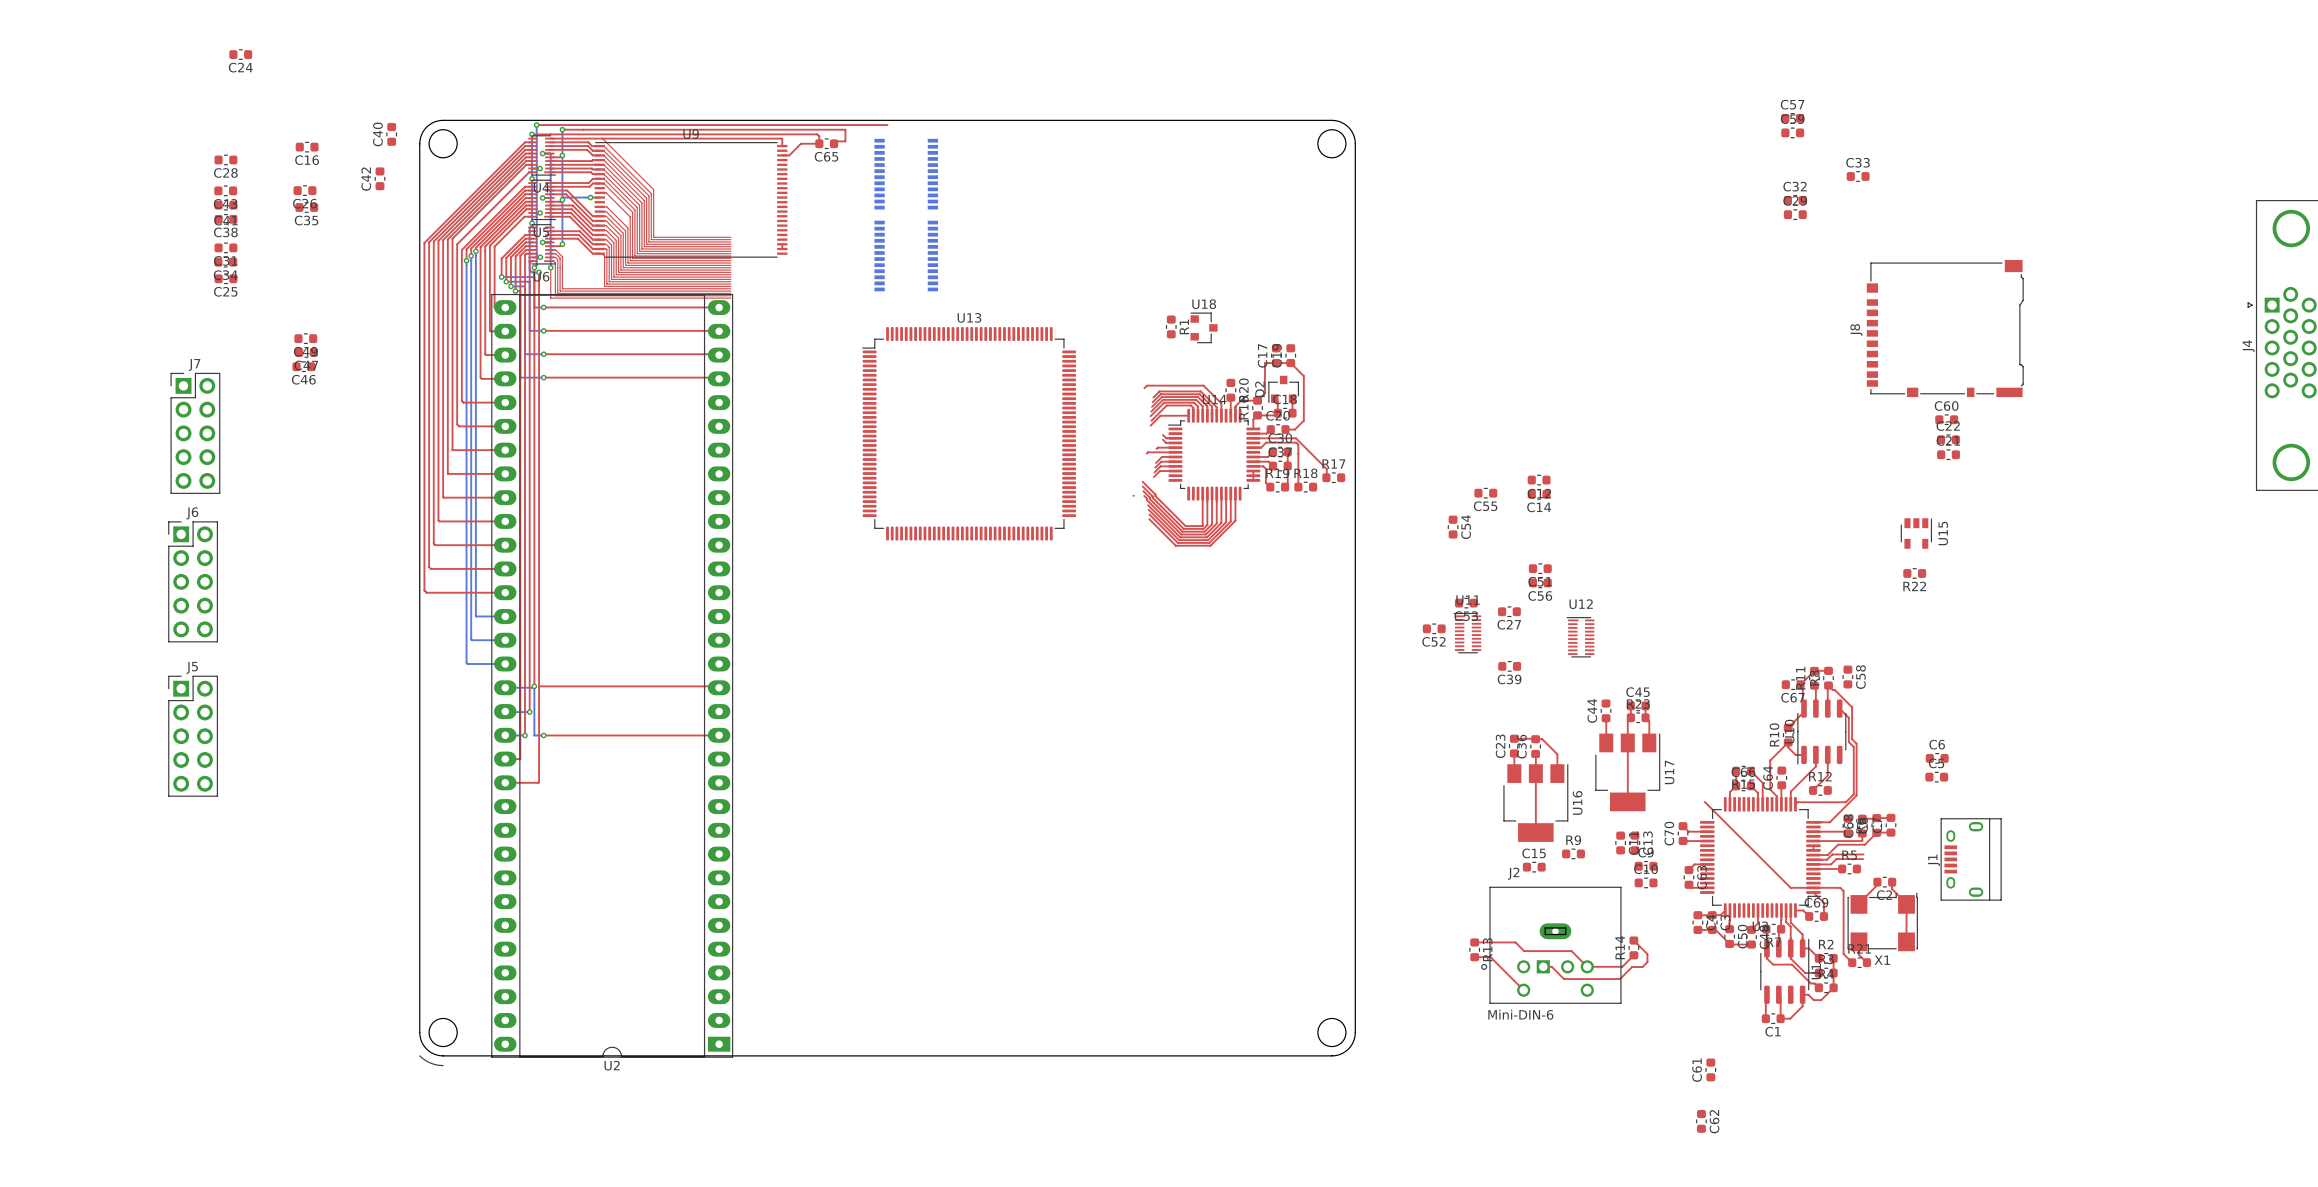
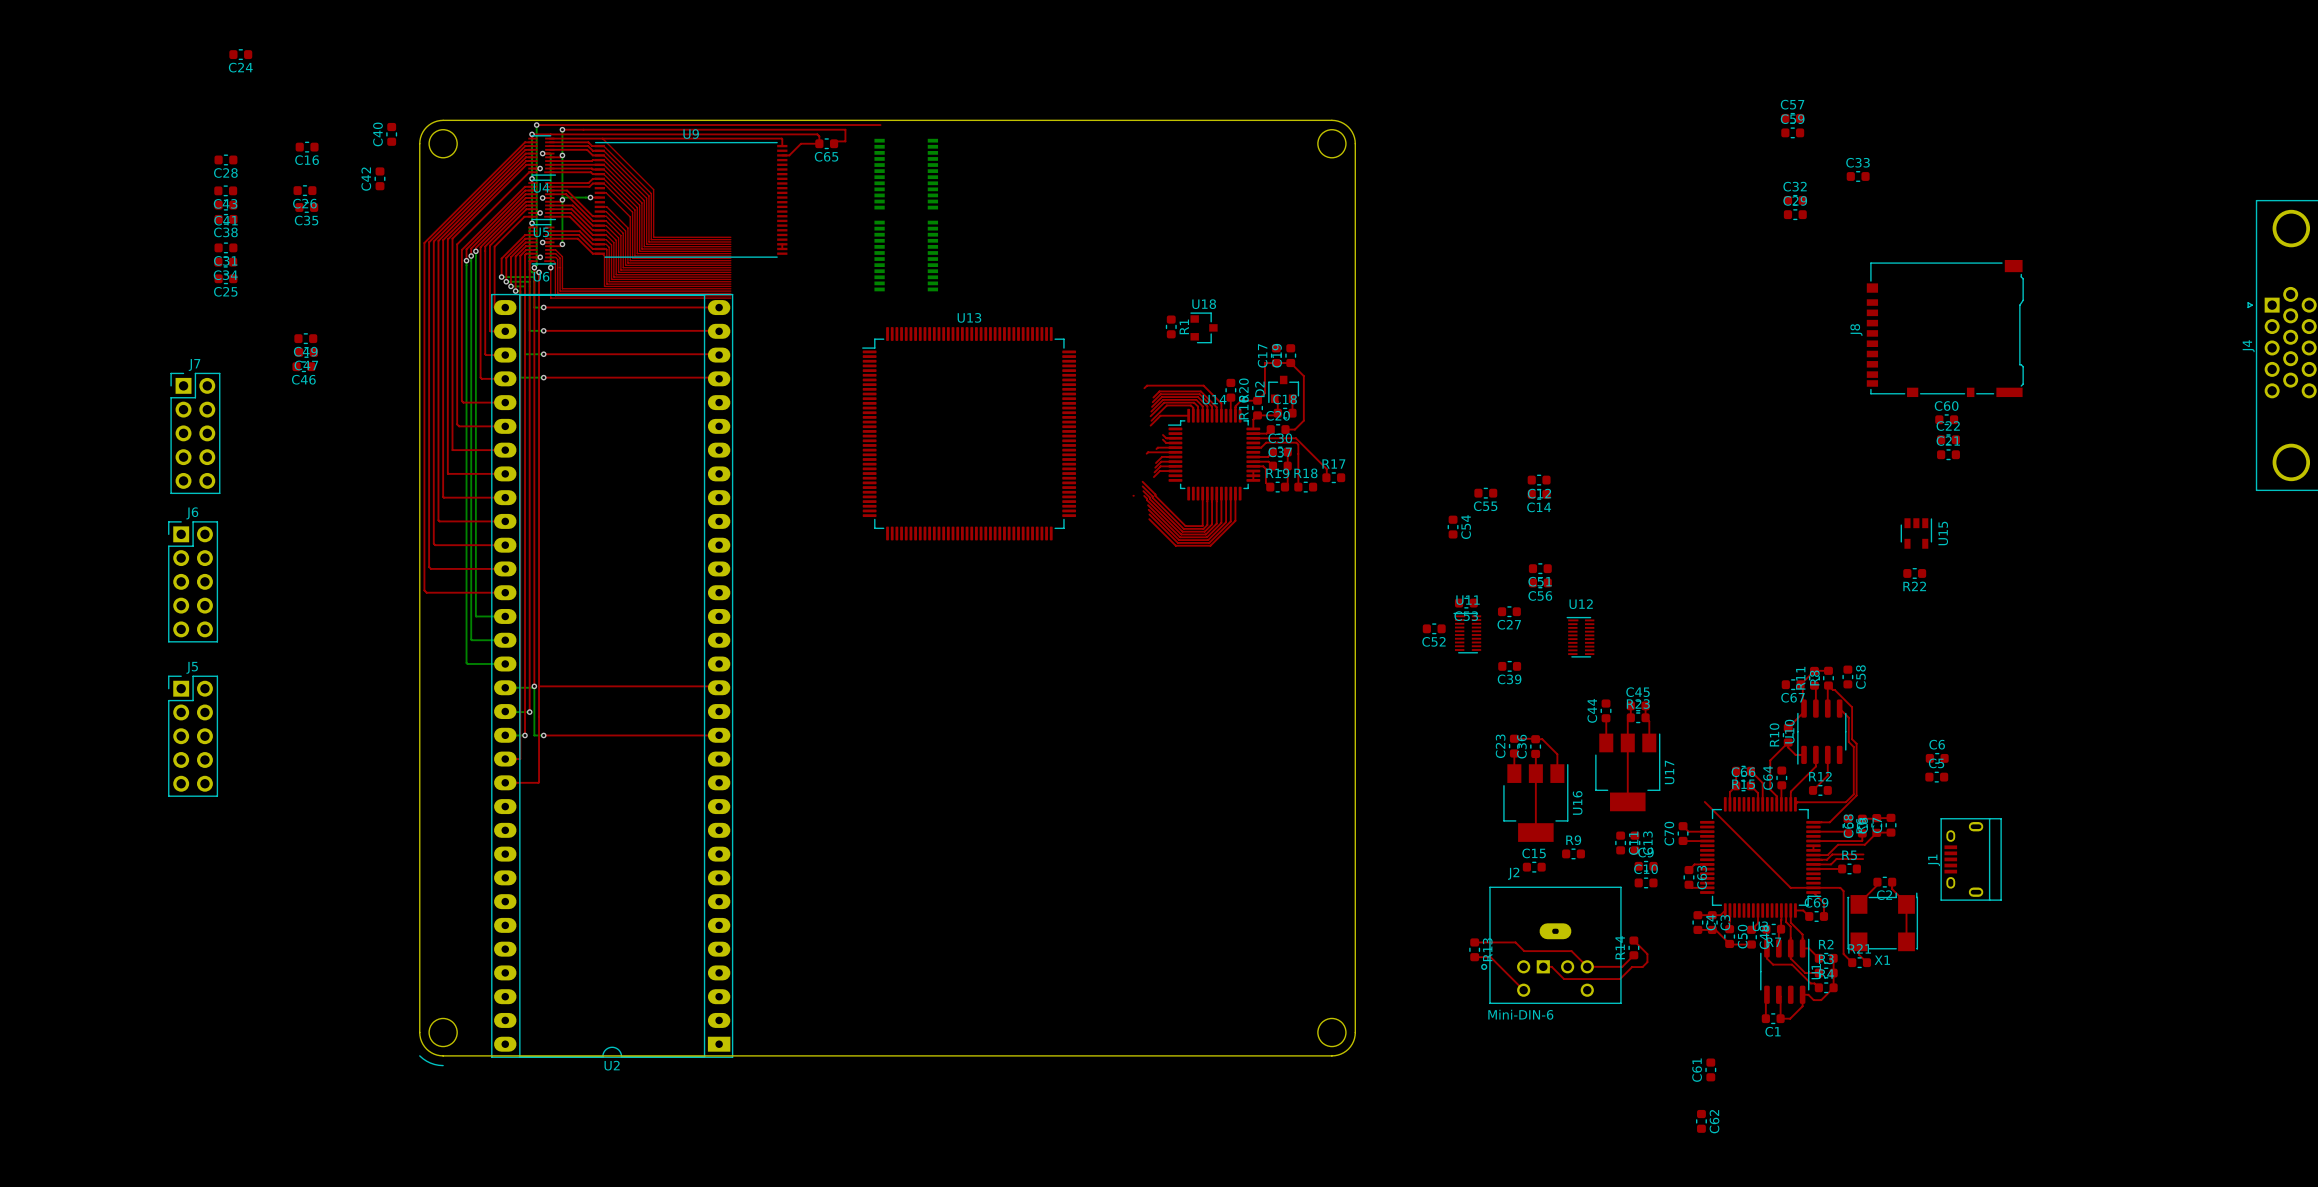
top track: (880, 125) (887, 125) -> none

